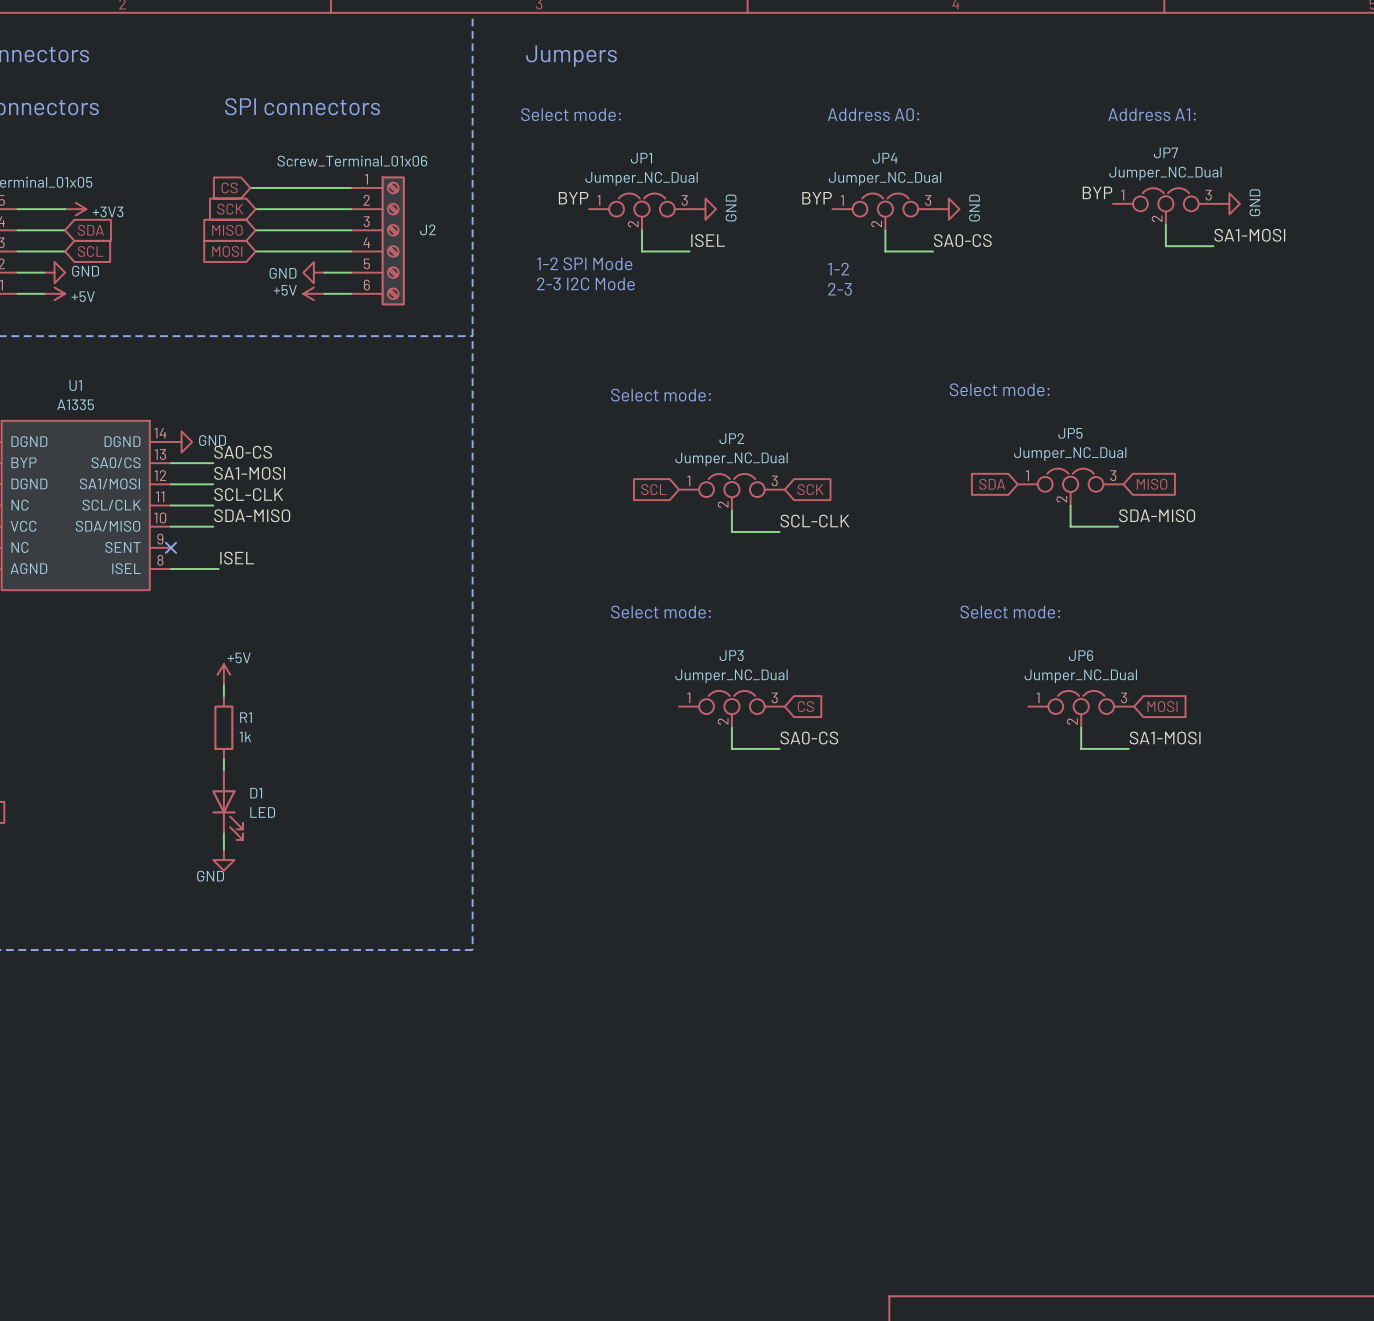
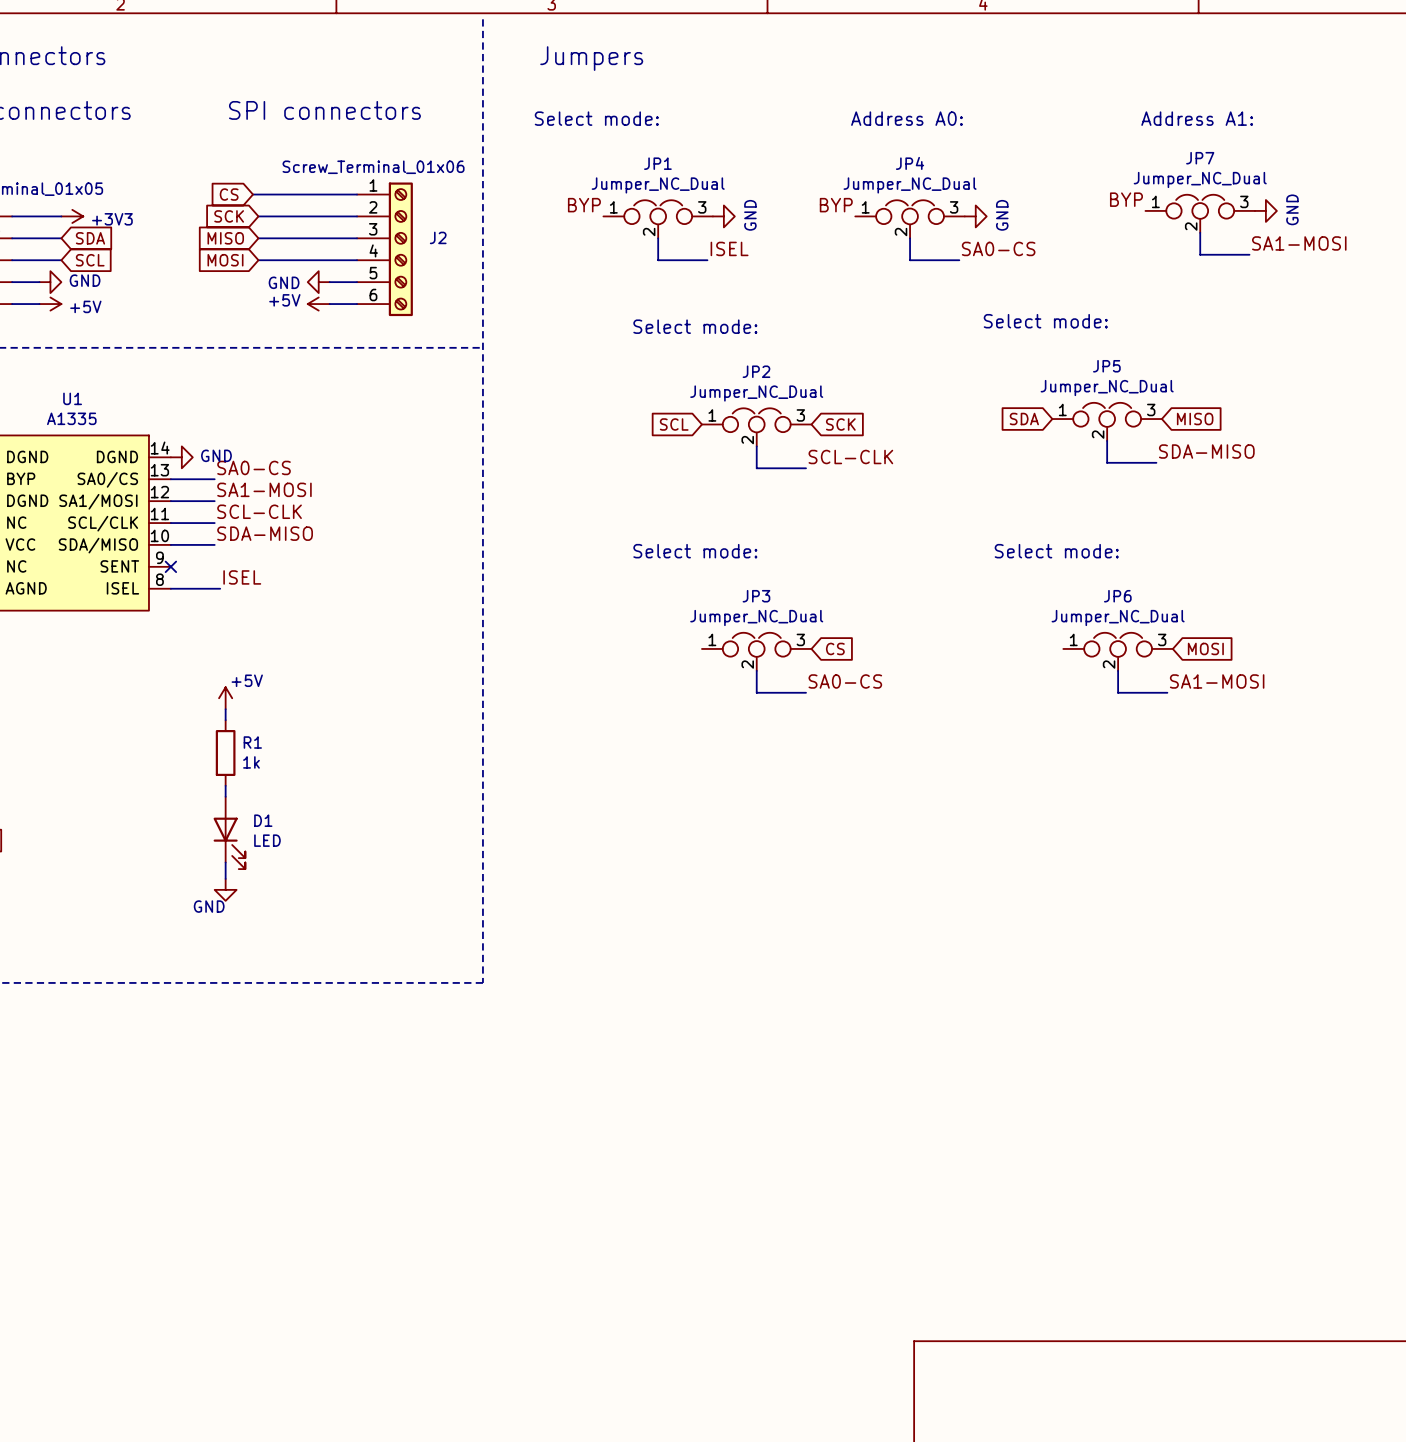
text: 1-2 SPI Mode (584, 263) -> none
text: 1-2 (838, 269) -> none
text: 2-3 I2C Mode (585, 283) -> none
text: 2-3 (840, 289) -> none
text: none -> Select mode: (1045, 321)
text: none -> Select mode: (695, 326)
text: Select mode: (999, 389) -> none
text: Select mode: (660, 395) -> none
global label position: SDA (992, 484) -> SDA (1024, 419)
global label position: MISO (1152, 484) -> MISO (1195, 419)
JP5 position: (1070, 487) -> (1107, 421)
global label position: SCL (653, 489) -> SCL (674, 424)
global label position: SCK (810, 489) -> SCK (840, 424)
JP2 position: (731, 492) -> (756, 427)
wire: (1070, 505) (1070, 526) (1118, 526) -> (1107, 440) (1107, 462) (1156, 462)
wire: (731, 510) (731, 531) (779, 531) -> (756, 446) (756, 468) (806, 468)
label position: SDA-MISO (1157, 515) -> SDA-MISO (1206, 451)
label position: SCL-CLK (814, 521) -> SCL-CLK (850, 457)
text: none -> Select mode: (695, 551)
text: none -> Select mode: (1056, 551)
text: Select mode: (660, 612) -> none
text: Select mode: (1010, 612) -> none
global label position: CS (805, 706) -> CS (835, 648)
global label position: MOSI (1162, 706) -> MOSI (1205, 648)
JP3 position: (731, 709) -> (756, 651)
JP6 position: (1081, 709) -> (1118, 651)
wire: (731, 727) (731, 748) (779, 748) -> (756, 670) (756, 692) (806, 692)
wire: (1081, 727) (1081, 748) (1128, 748) -> (1118, 670) (1118, 692) (1167, 692)
label position: SA0-CS (809, 738) -> SA0-CS (845, 681)
label position: SA1-MOSI (1165, 738) -> SA1-MOSI (1217, 681)

